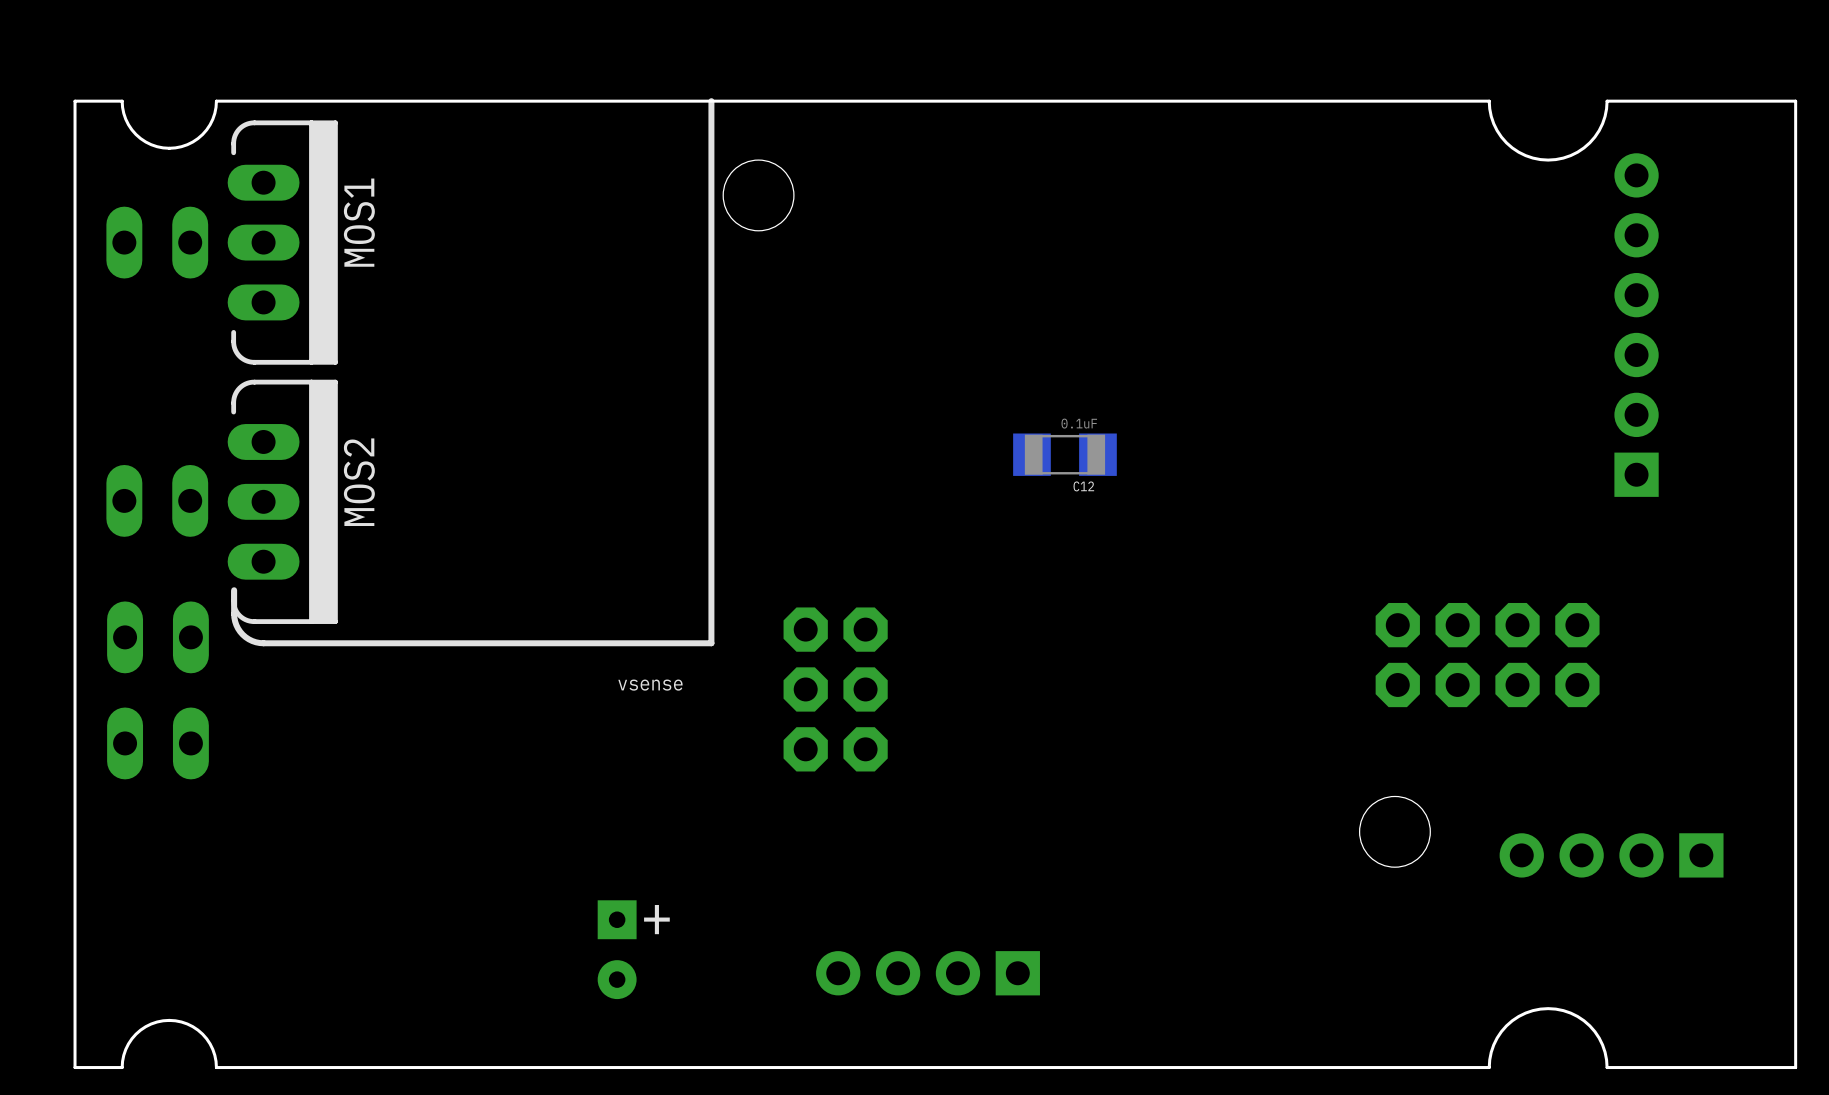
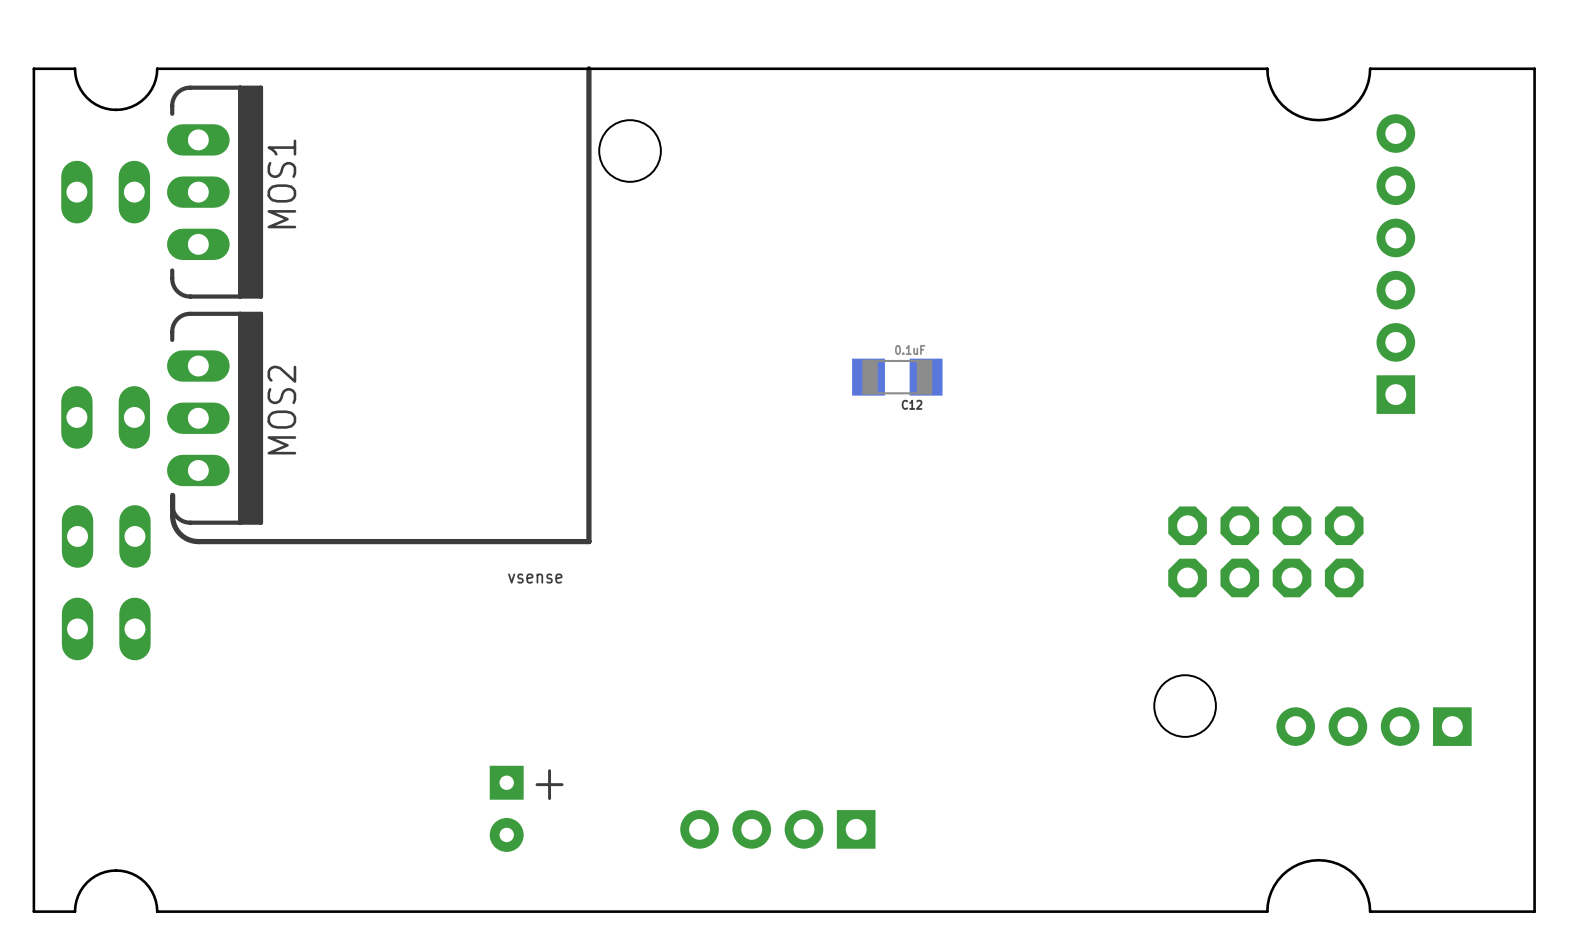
part: (835, 689) -> none

